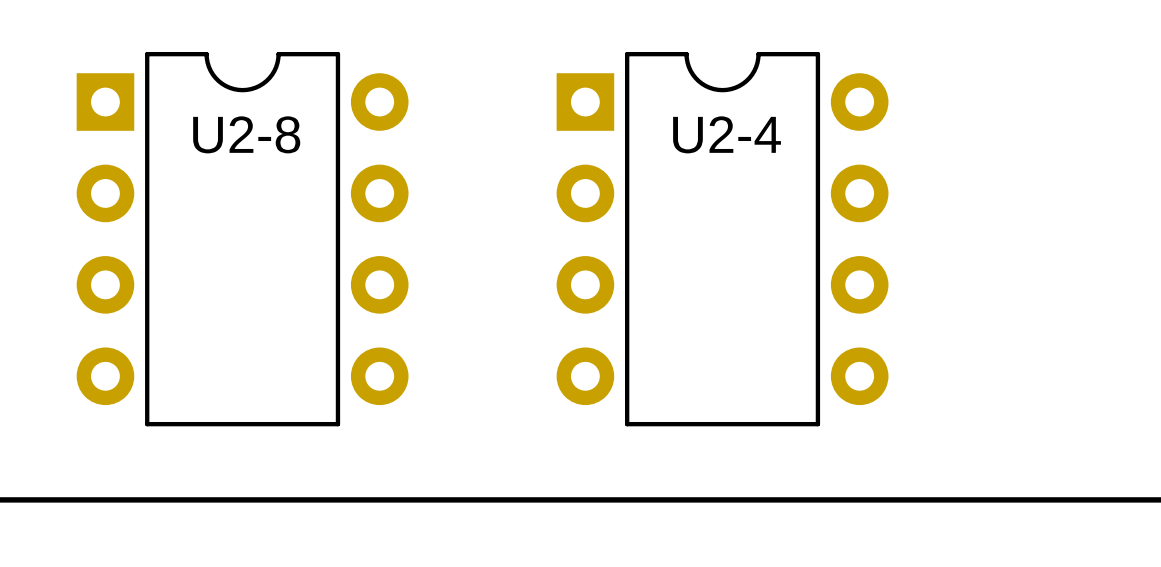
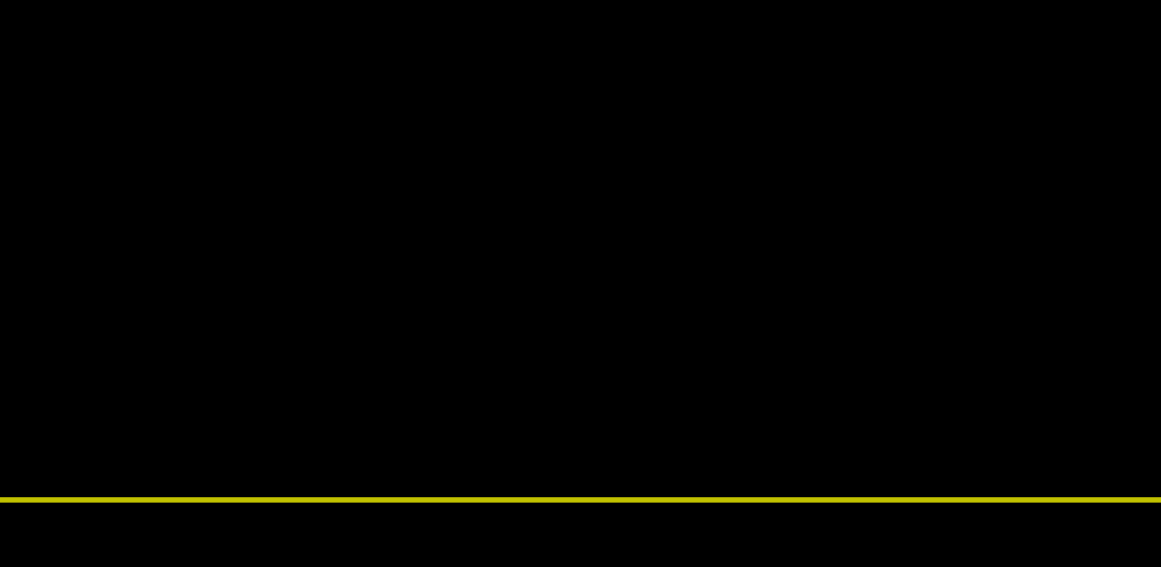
U2-8: (242, 239) -> none
U2-4: (722, 239) -> none

